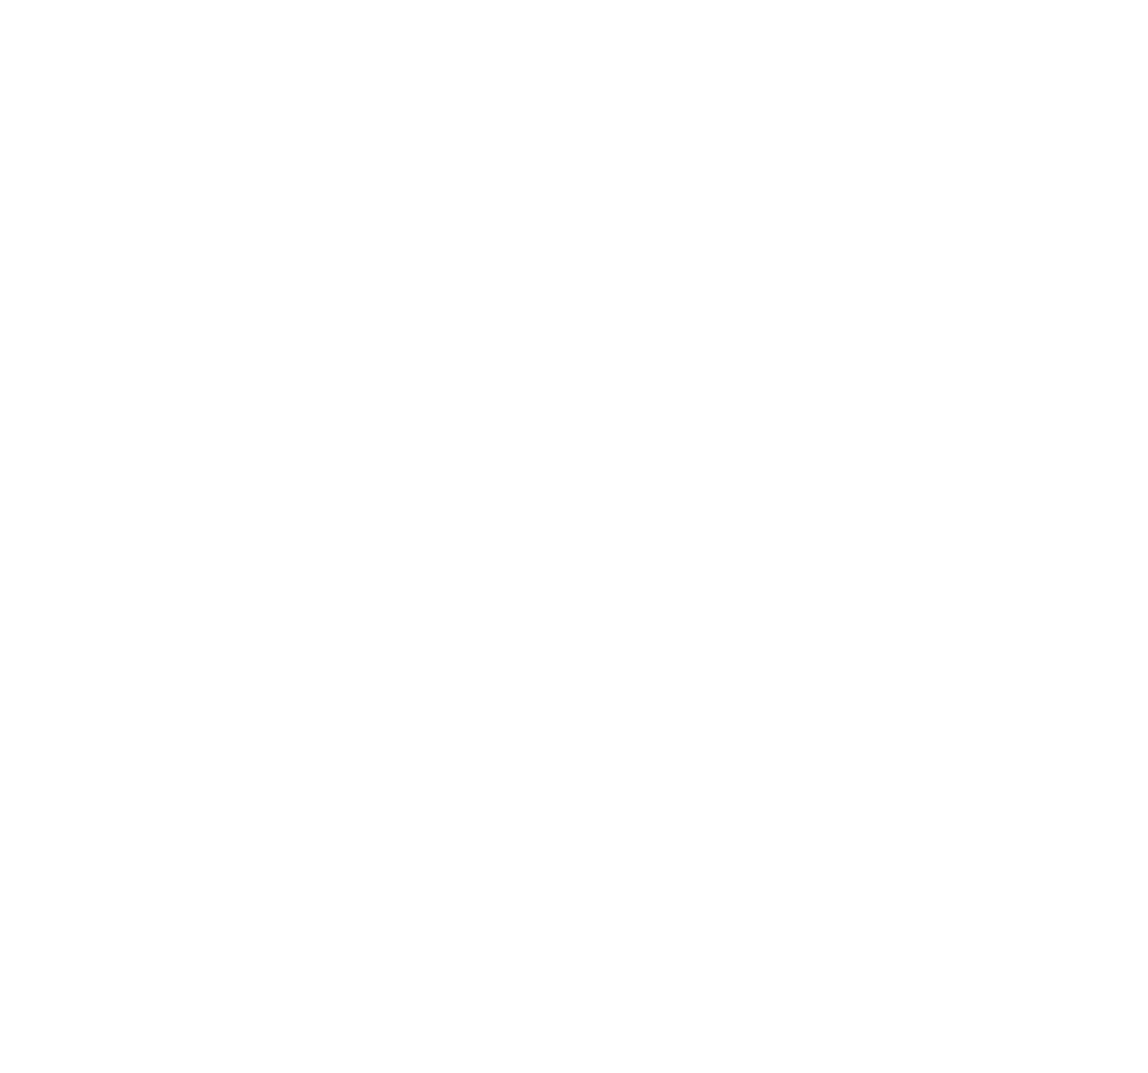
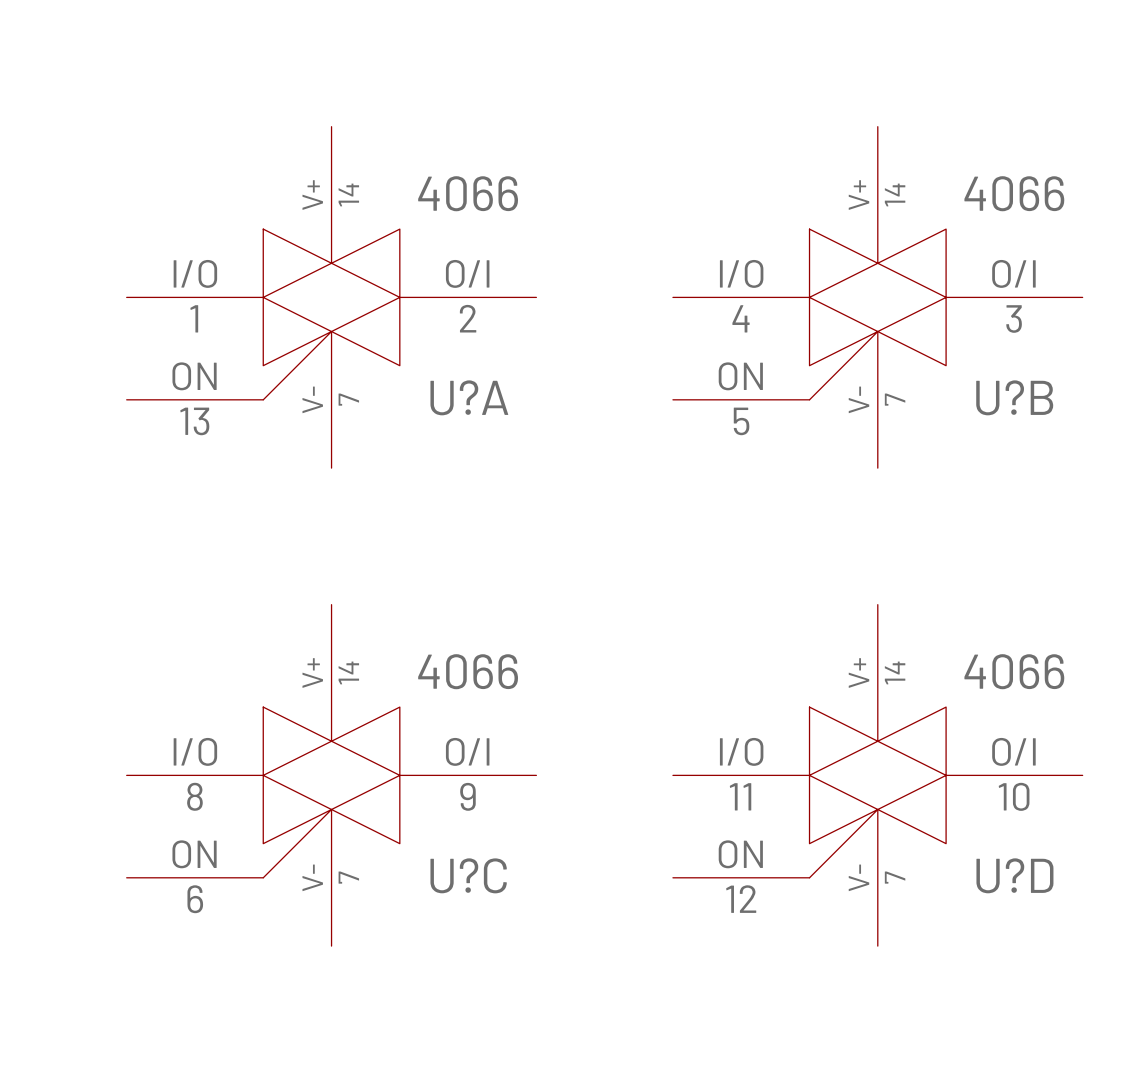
U?A: none -> 4066 (331, 297)
U?B: none -> 4066 (877, 297)
U?C: none -> 4066 (331, 775)
U?D: none -> 4066 (877, 775)

